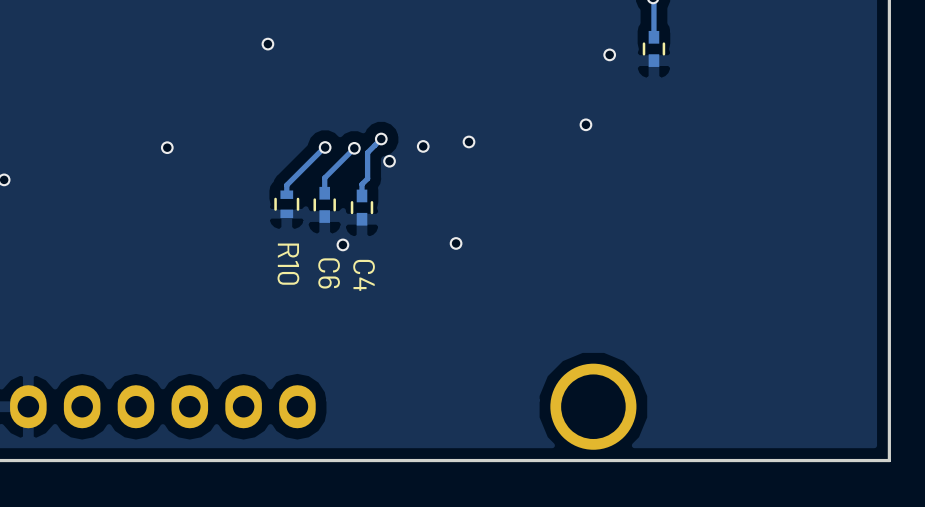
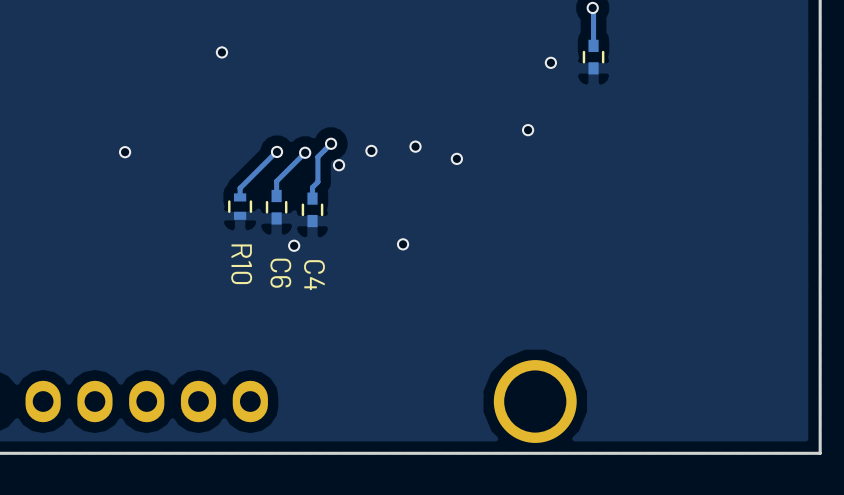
via: none -> (456, 158)

